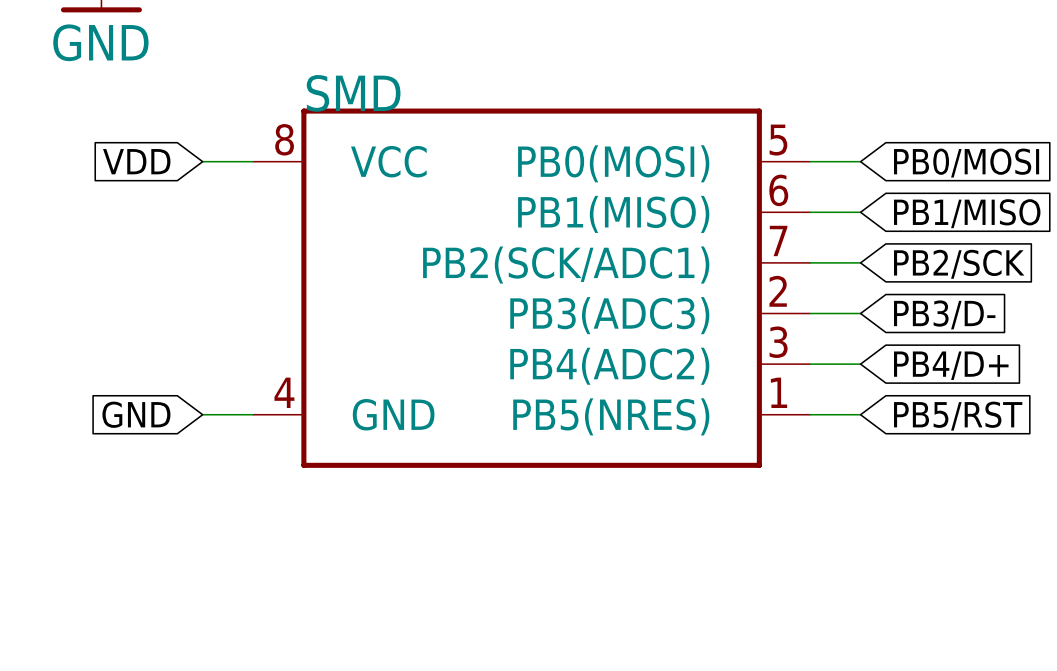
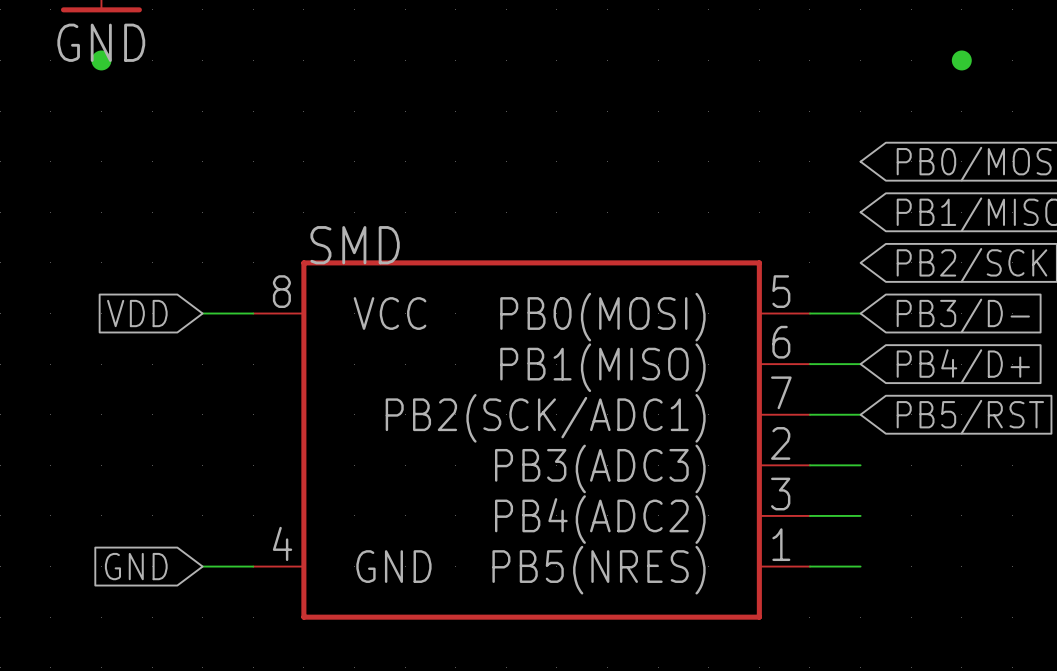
junction: none -> (101, 60)
junction: none -> (961, 60)
global label position: VDD (136, 161) -> VDD (137, 313)
wire: (202, 161) (253, 161) -> (202, 313) (253, 313)
wire: (809, 161) (860, 161) -> (809, 465) (860, 465)
wire: (809, 212) (860, 212) -> (809, 515) (860, 515)
wire: (809, 262) (860, 262) -> (809, 566) (860, 566)
SMD position: (531, 288) -> (531, 440)
global label position: GND (136, 414) -> GND (136, 566)
wire: (202, 414) (253, 414) -> (202, 566) (253, 566)

